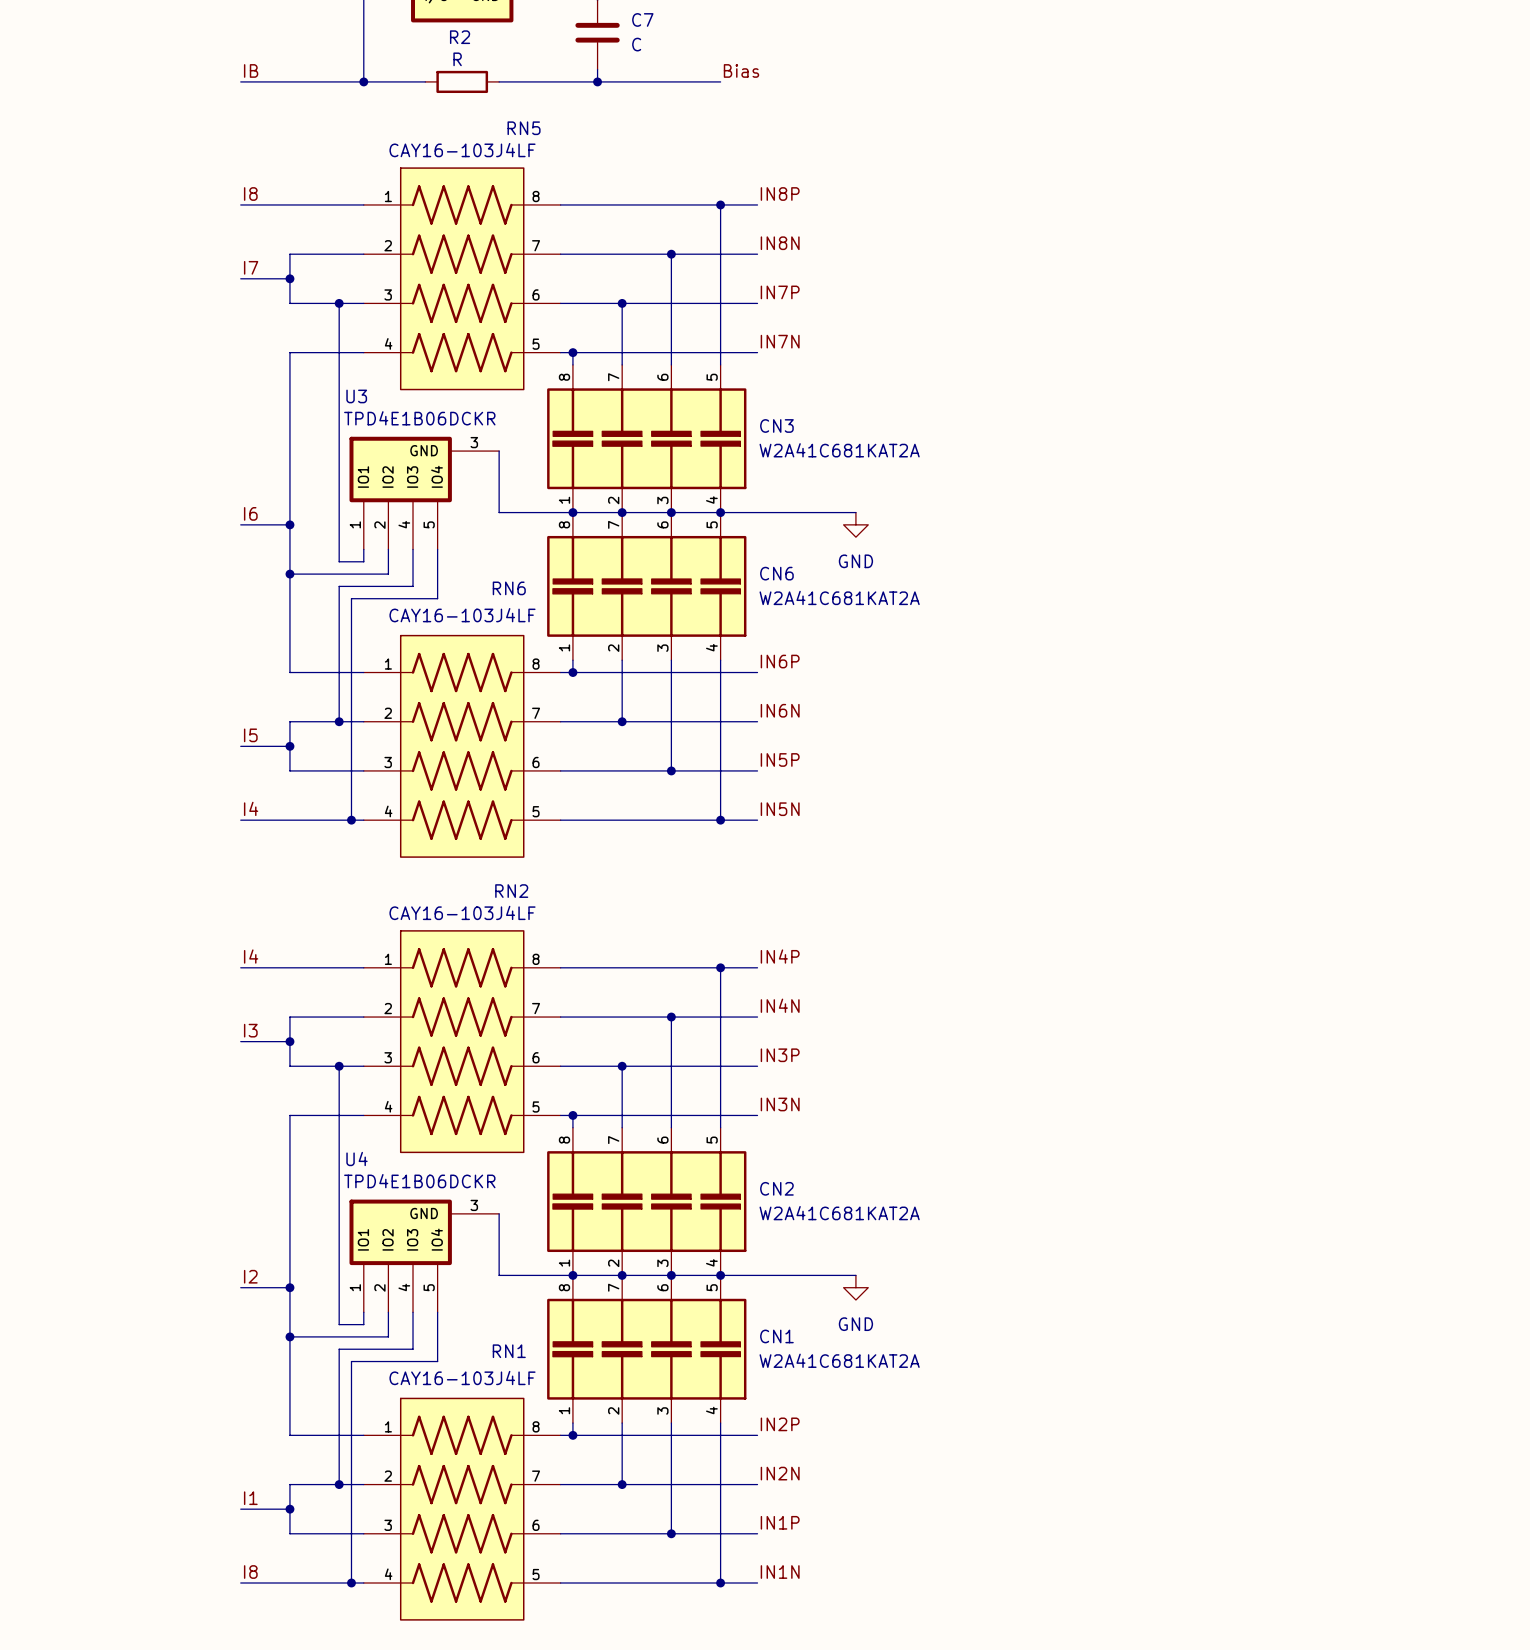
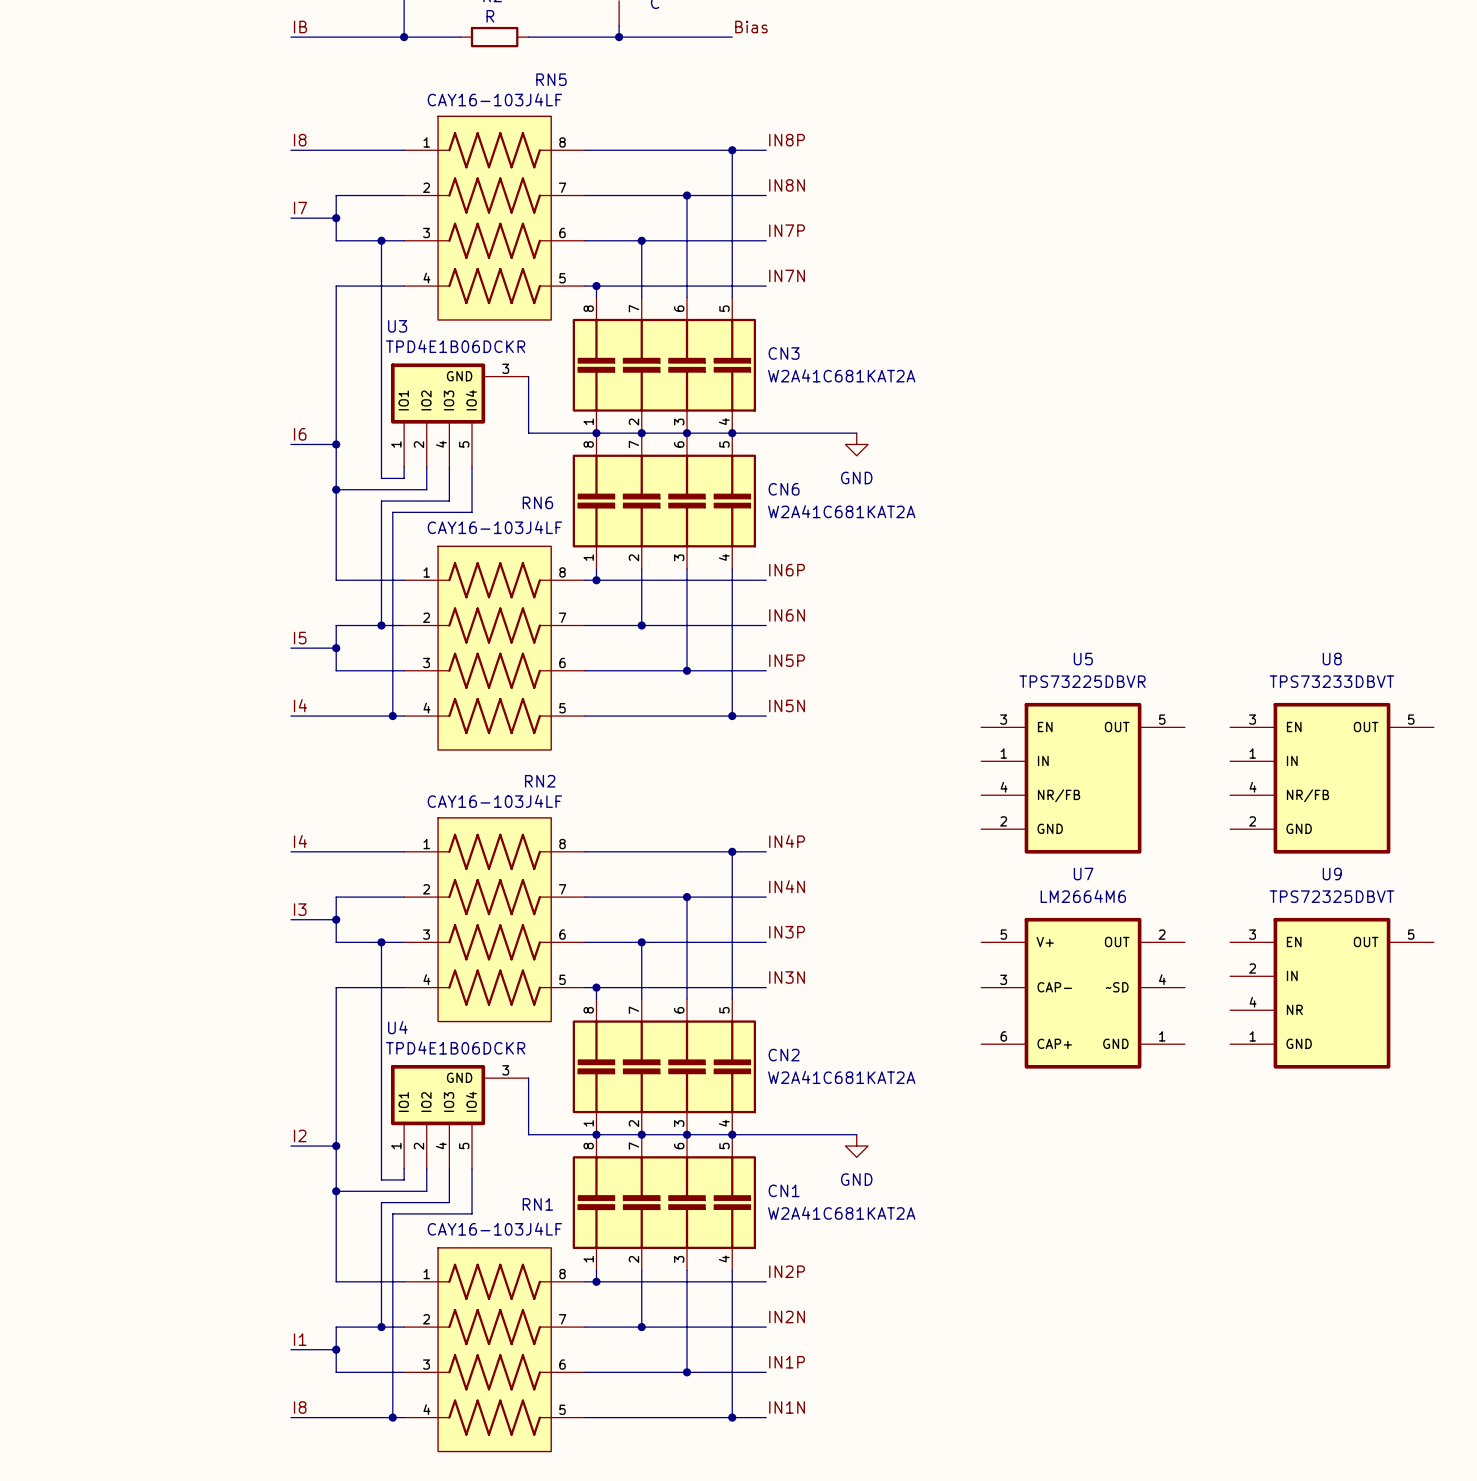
U5: none -> TPS73225DBVR (1083, 778)
U8: none -> TPS73233DBVT (1331, 778)
U7: none -> LM2664M6 (1083, 993)
U9: none -> TPS72325DBVT (1331, 993)

